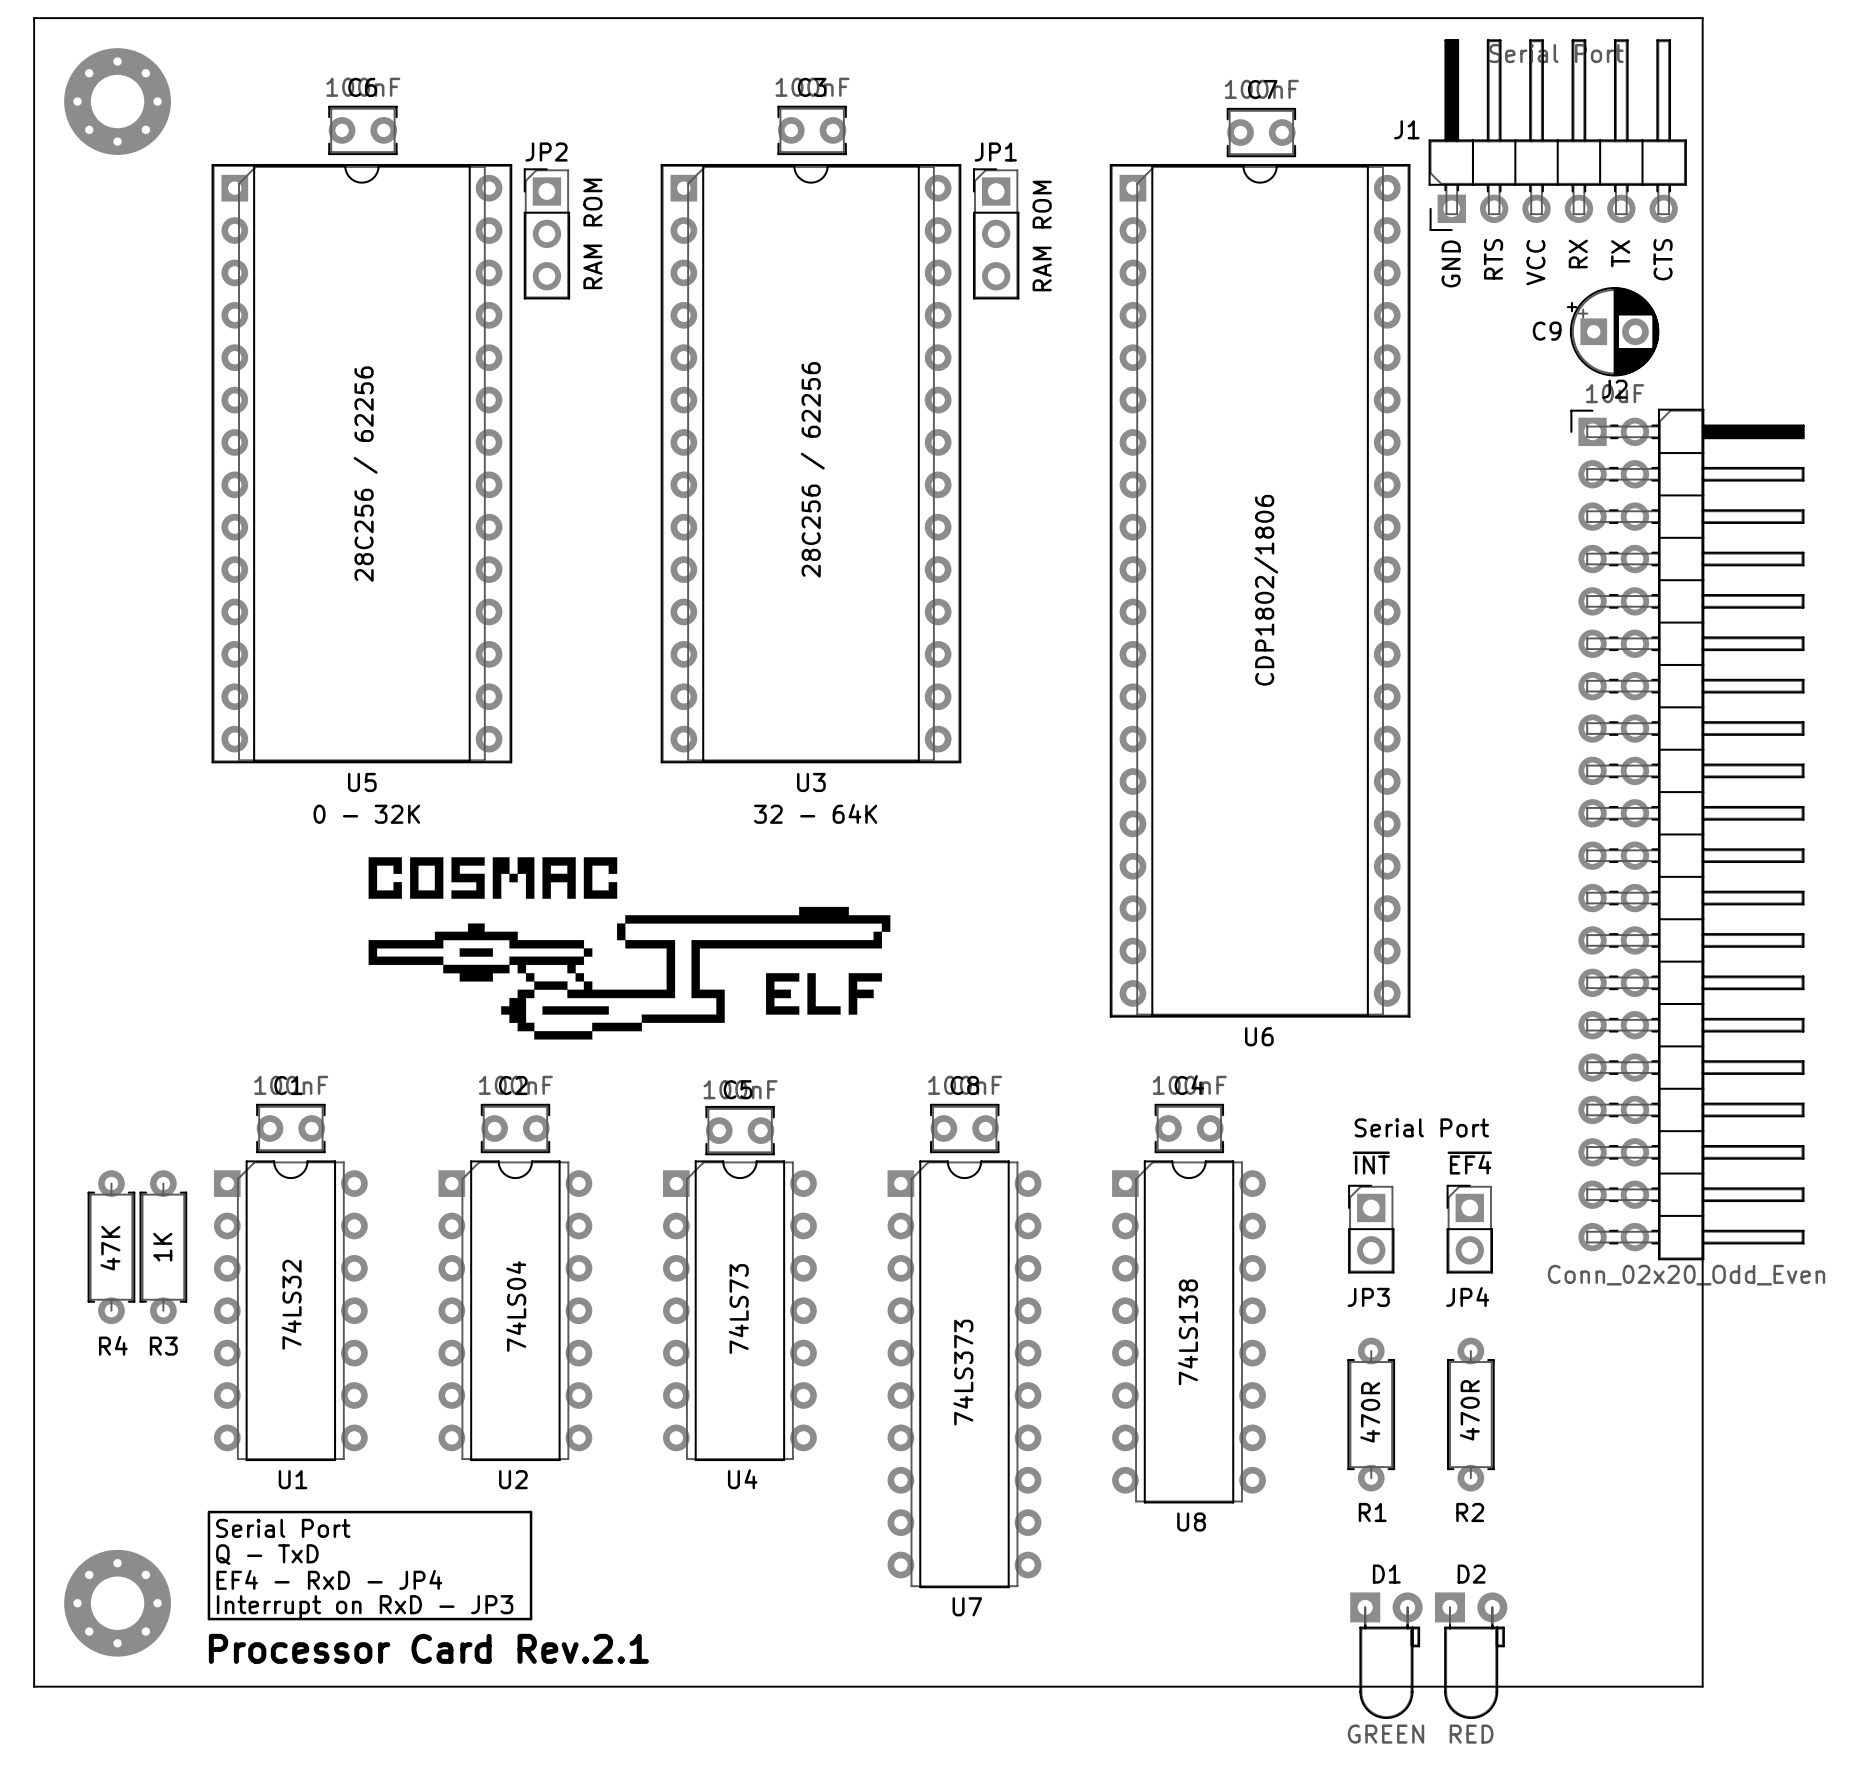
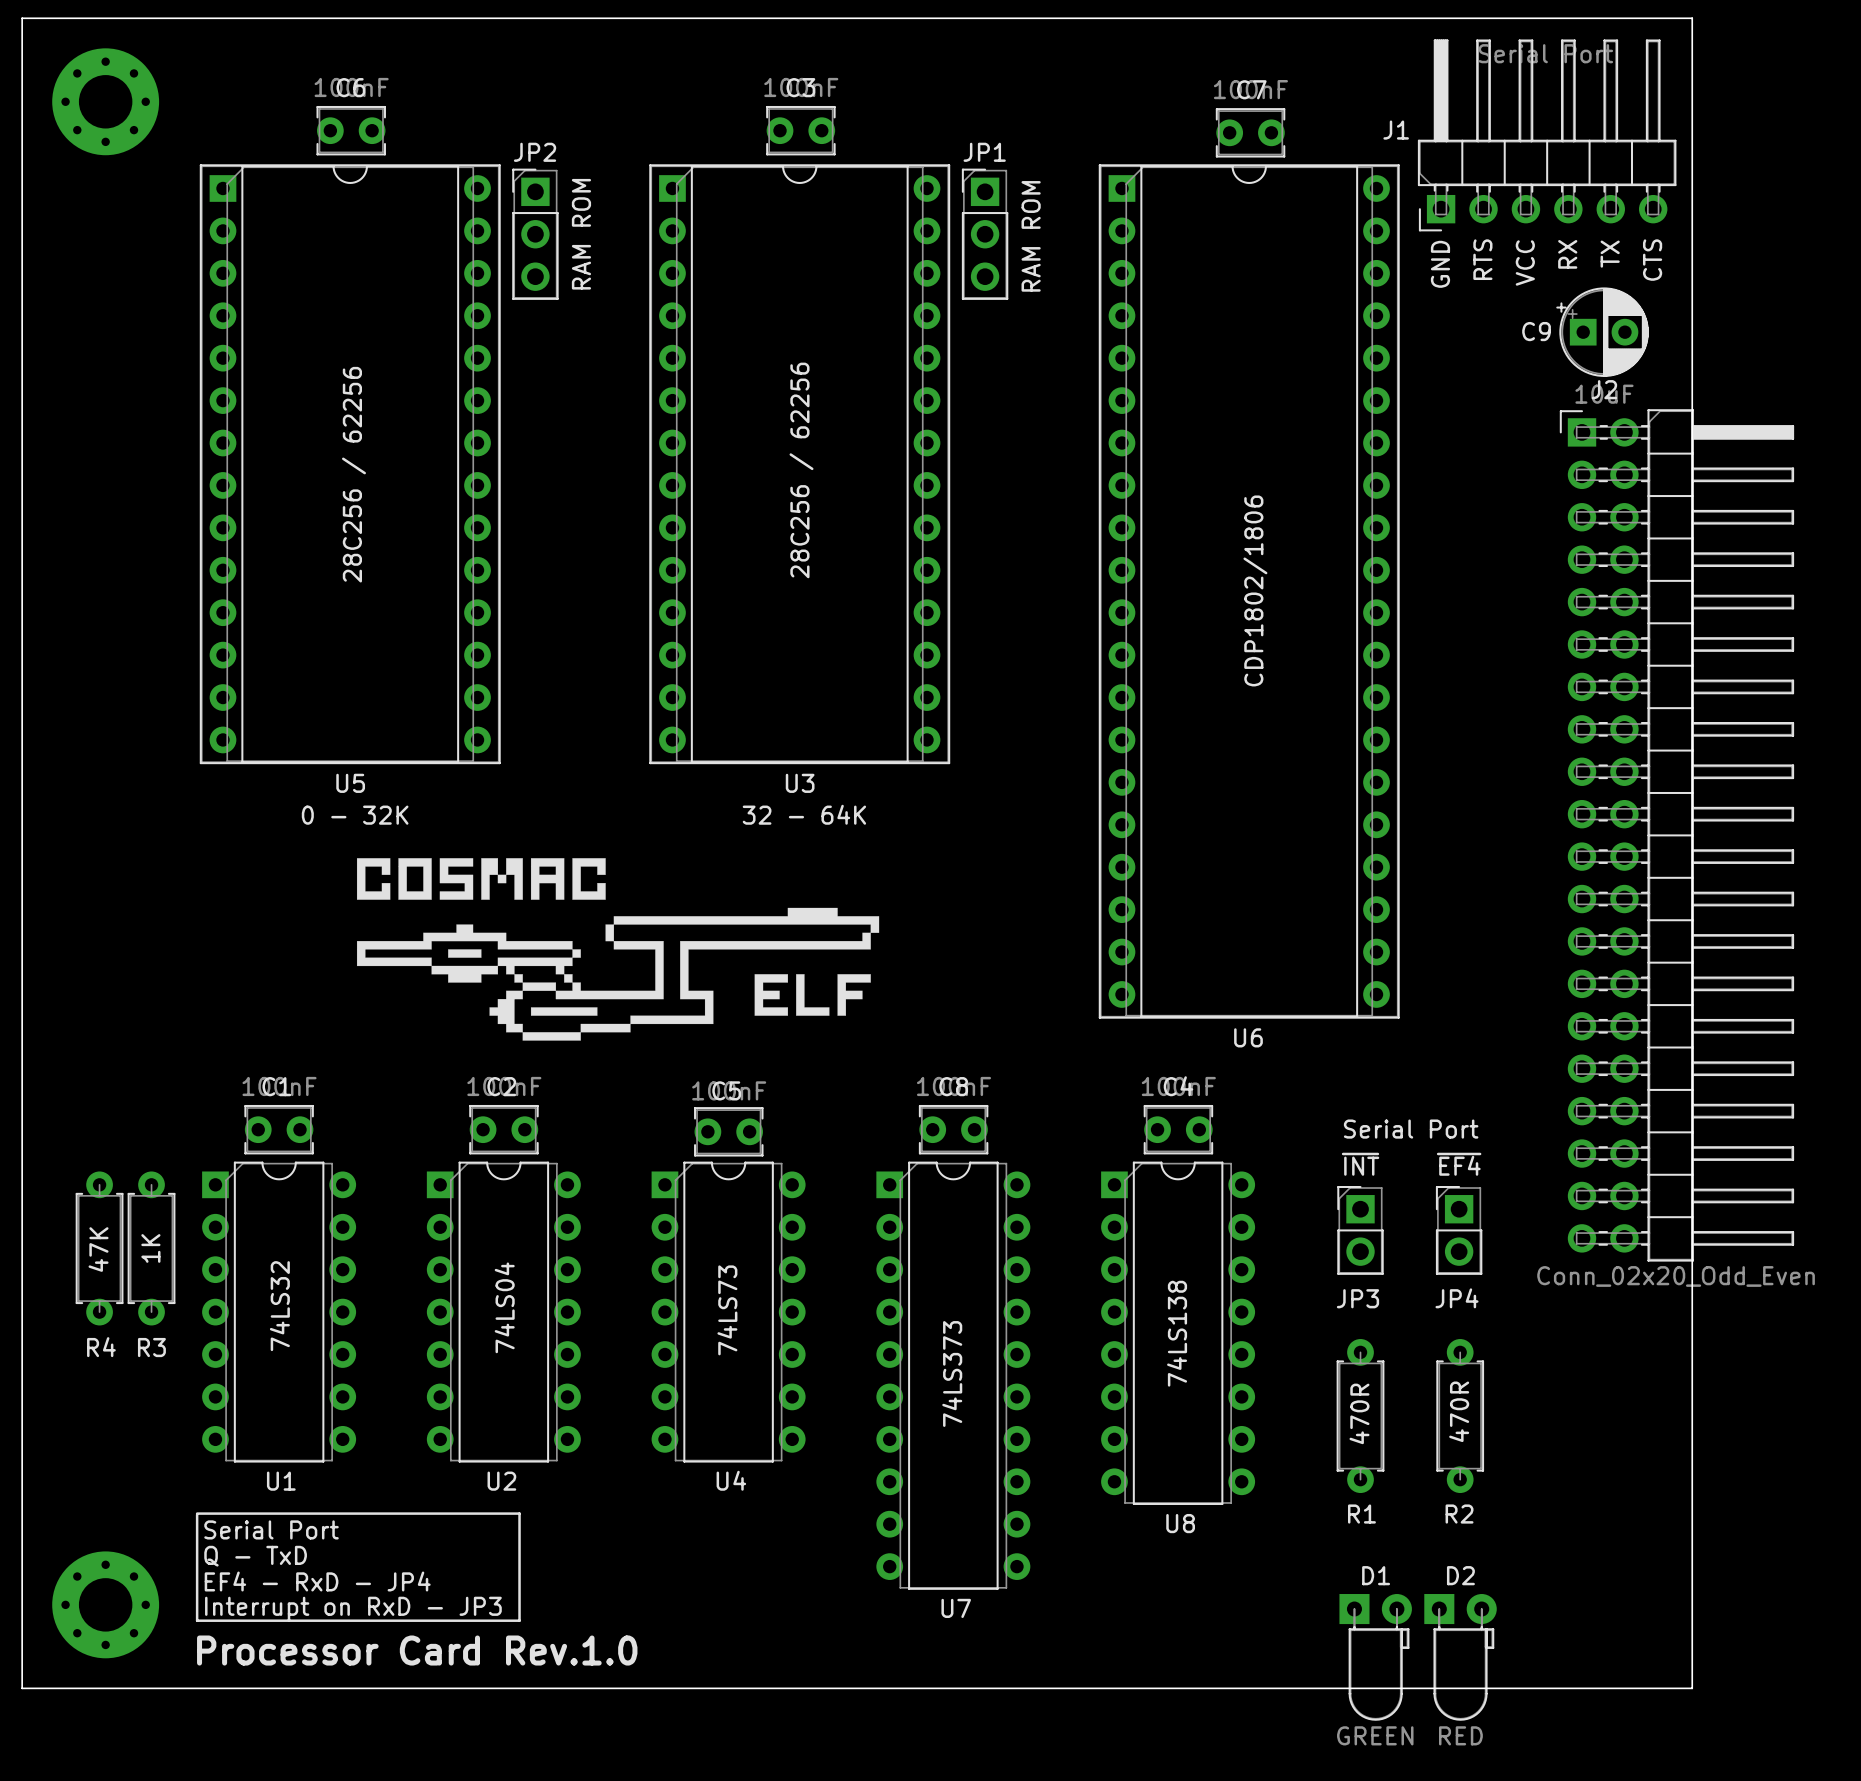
text: Processor Card Rev.2.1 (428, 1648) -> Processor Card Rev.1.0 (417, 1650)

